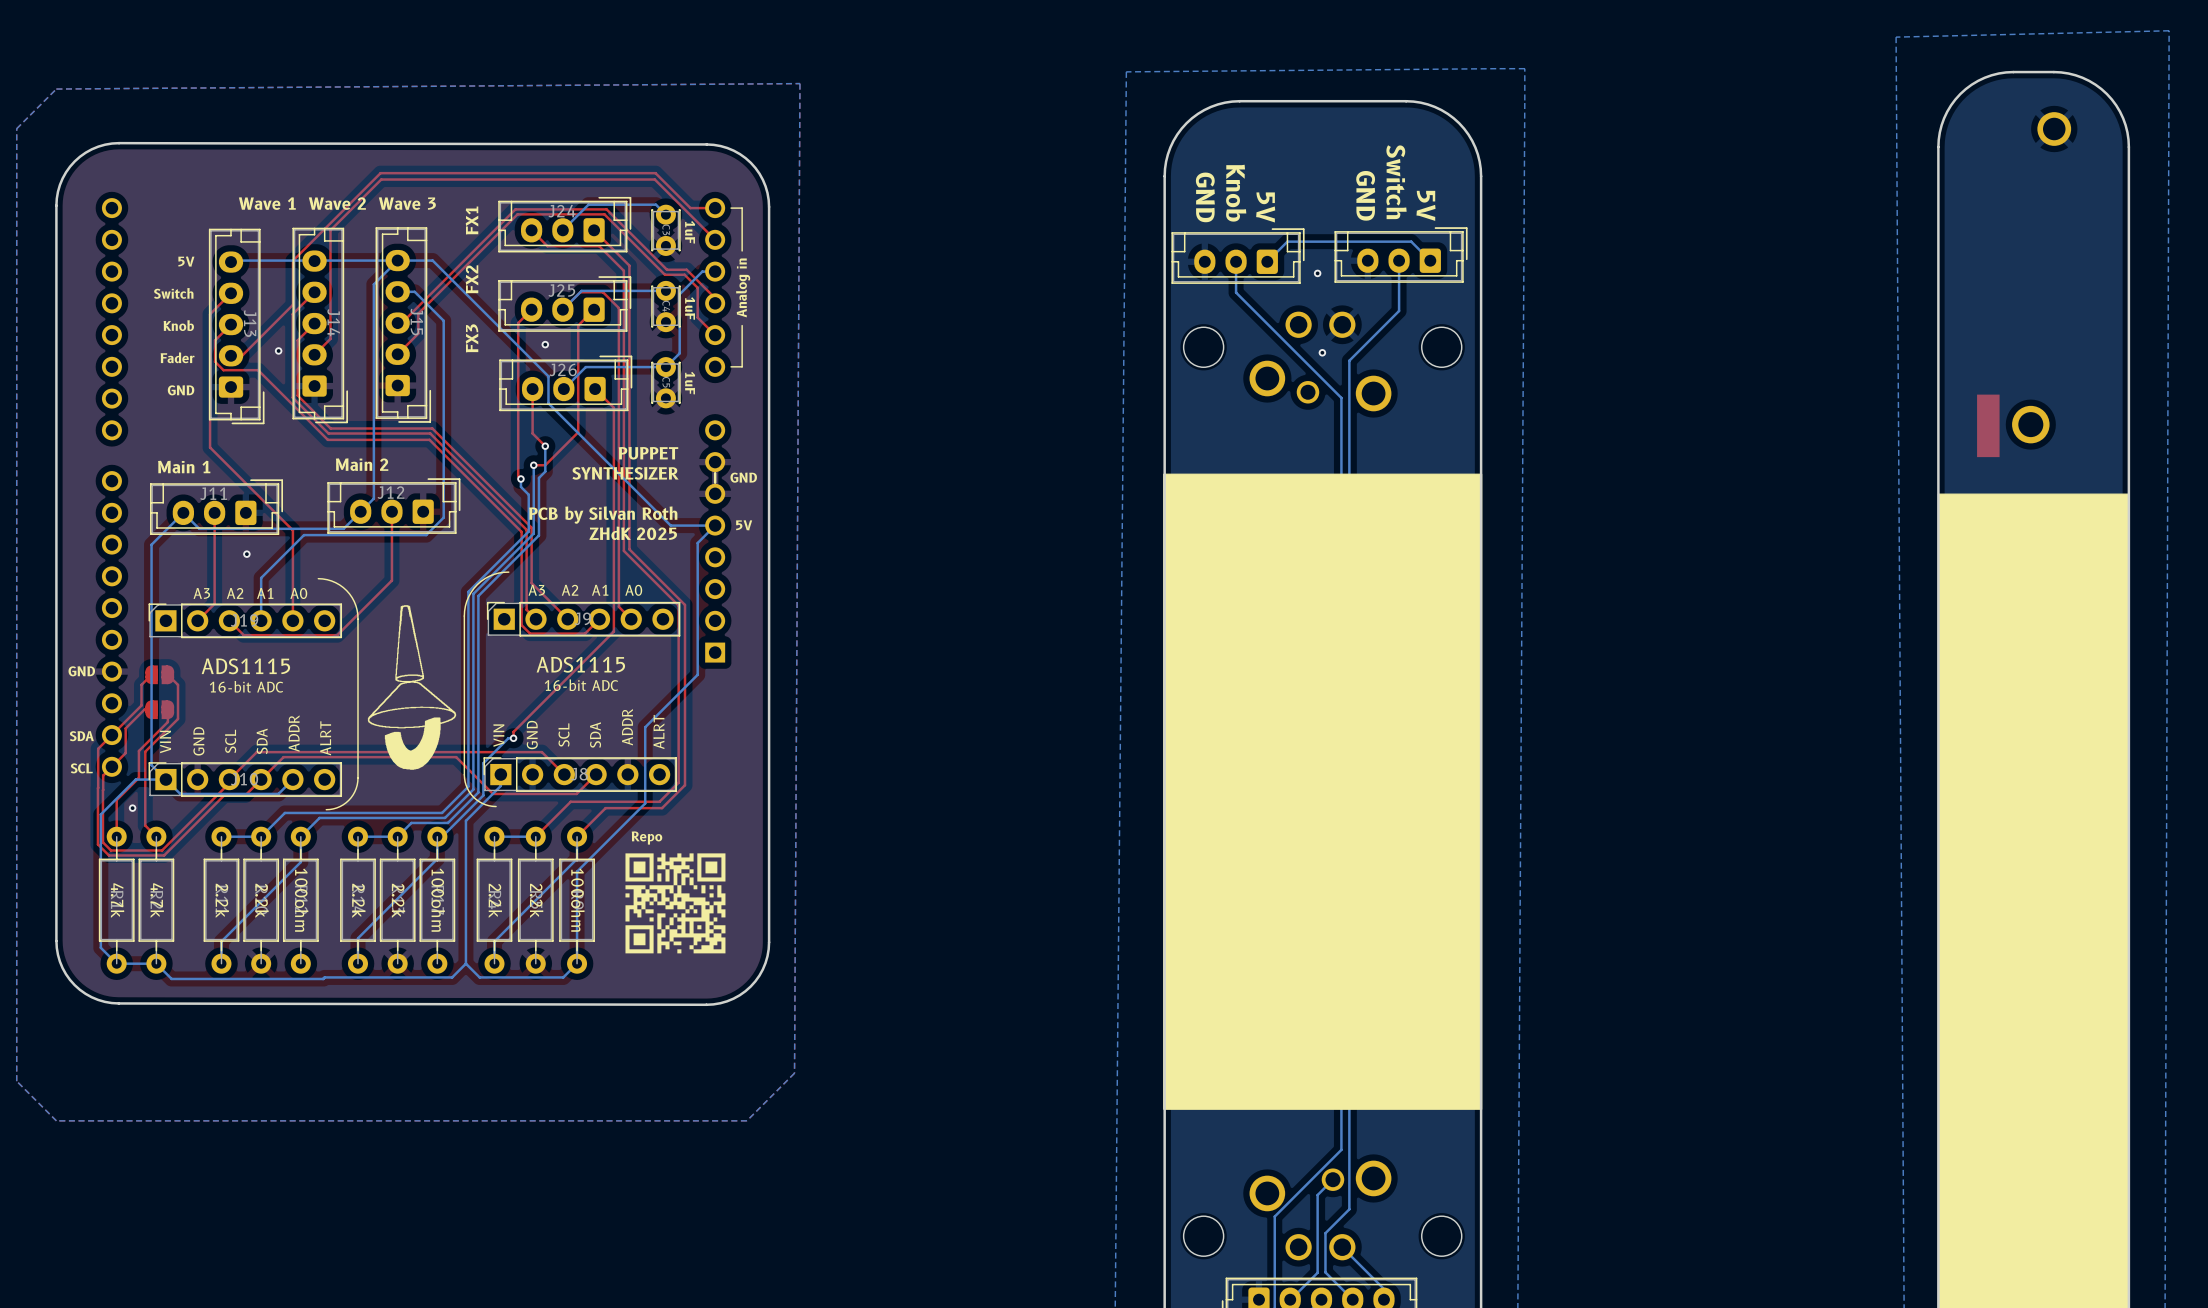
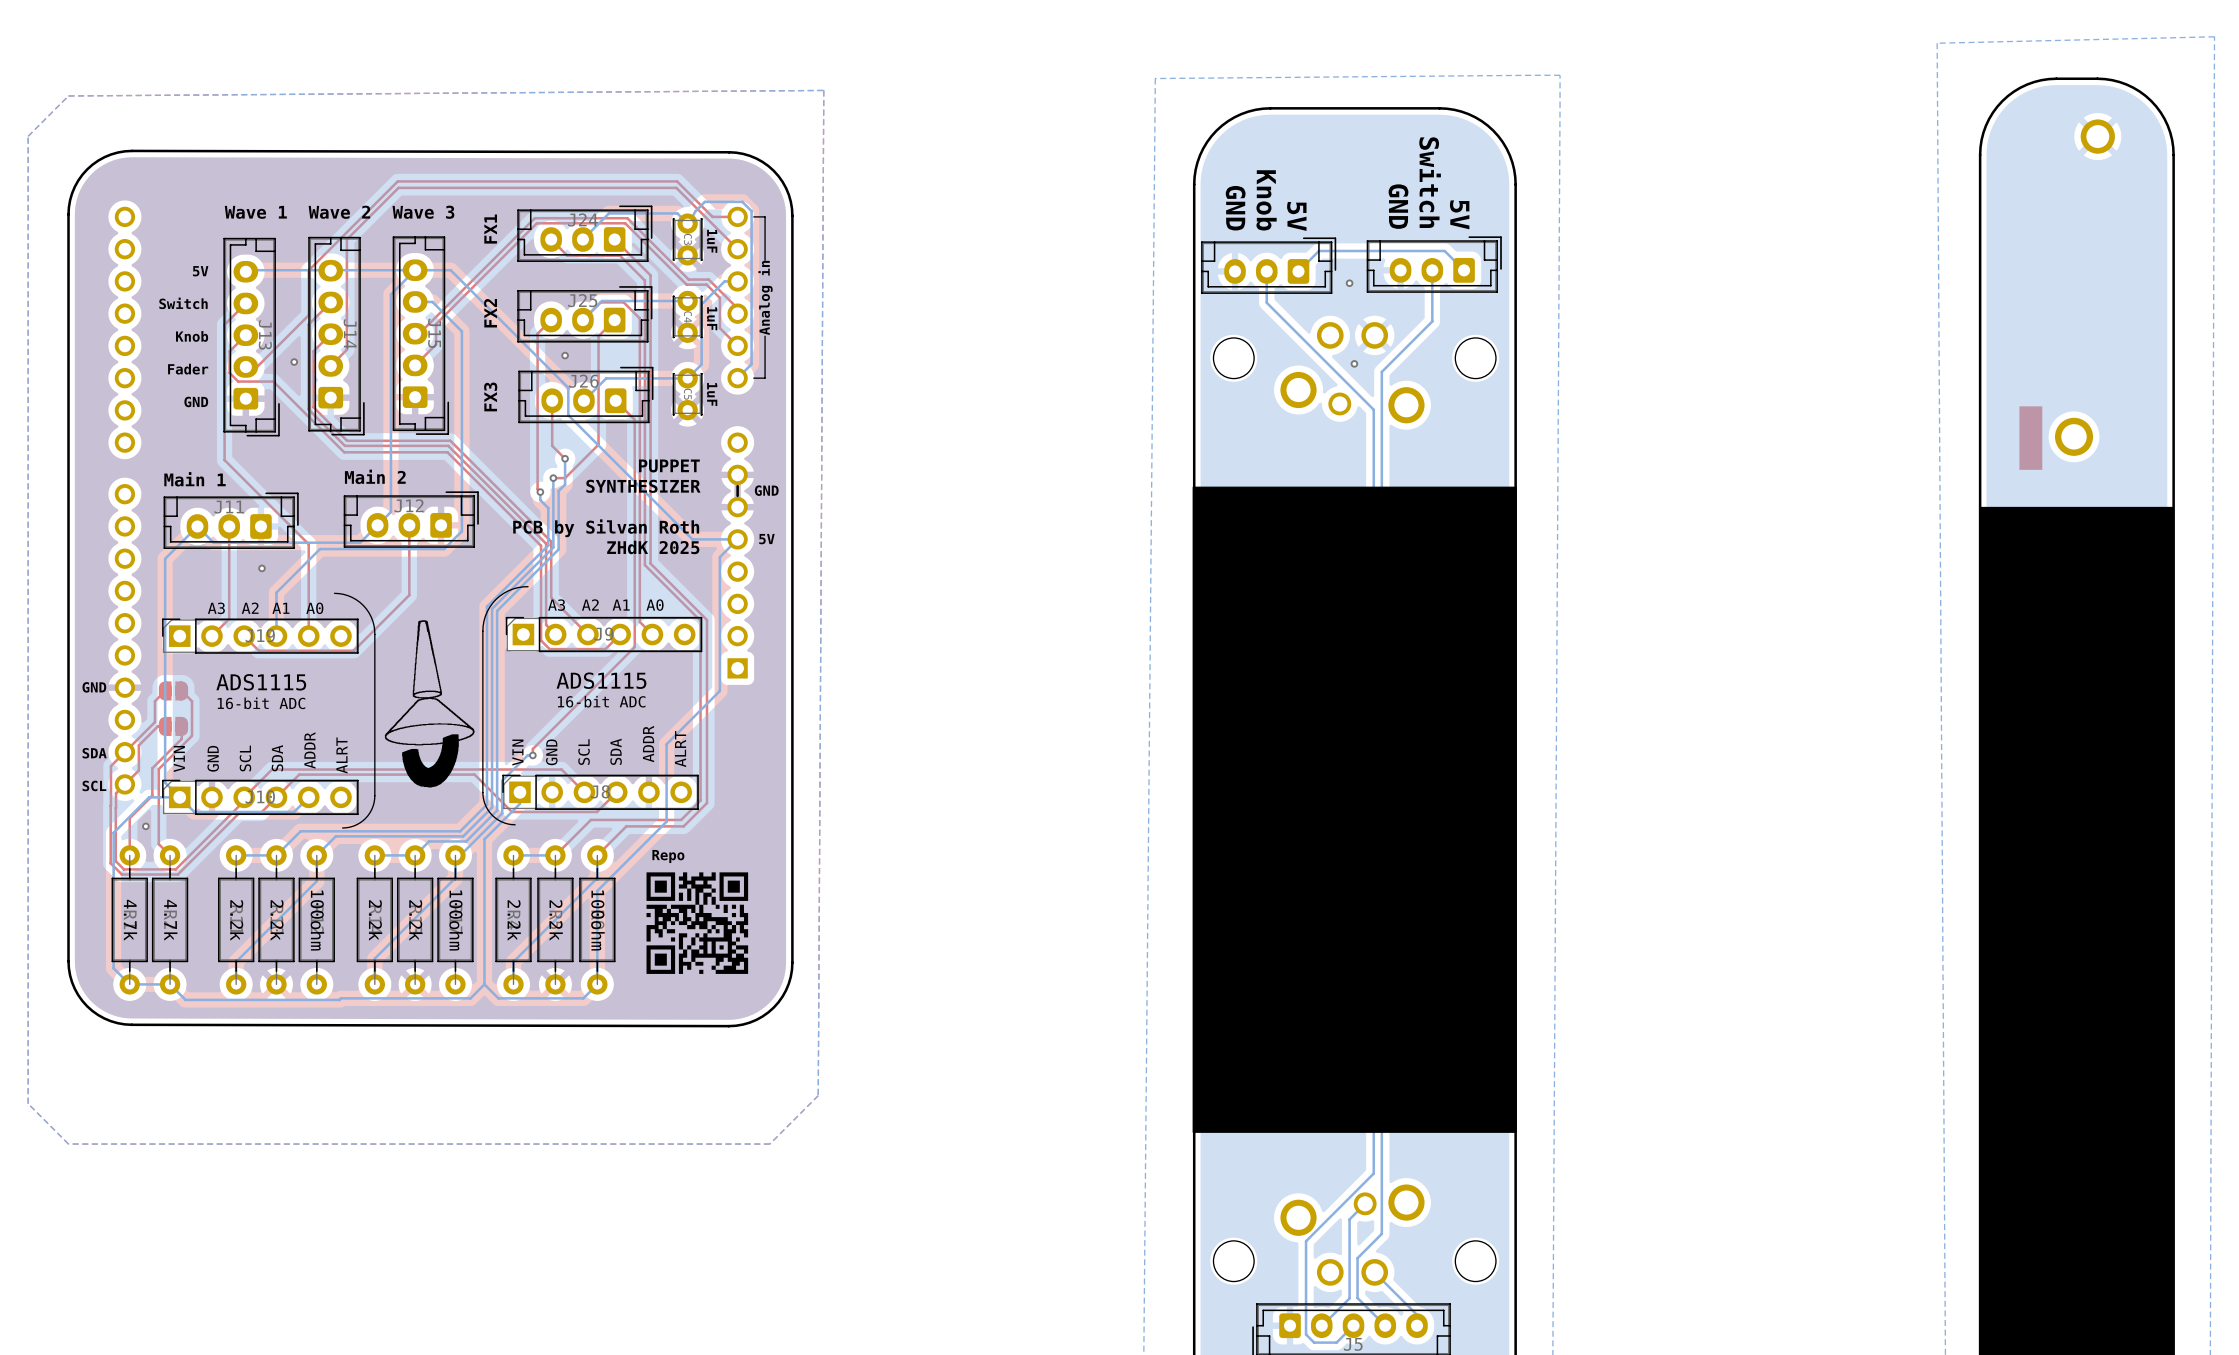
bottom track: none -> (692, 217) (695, 211) (704, 201) (742, 201) (751, 211) (751, 364) (737, 378)

